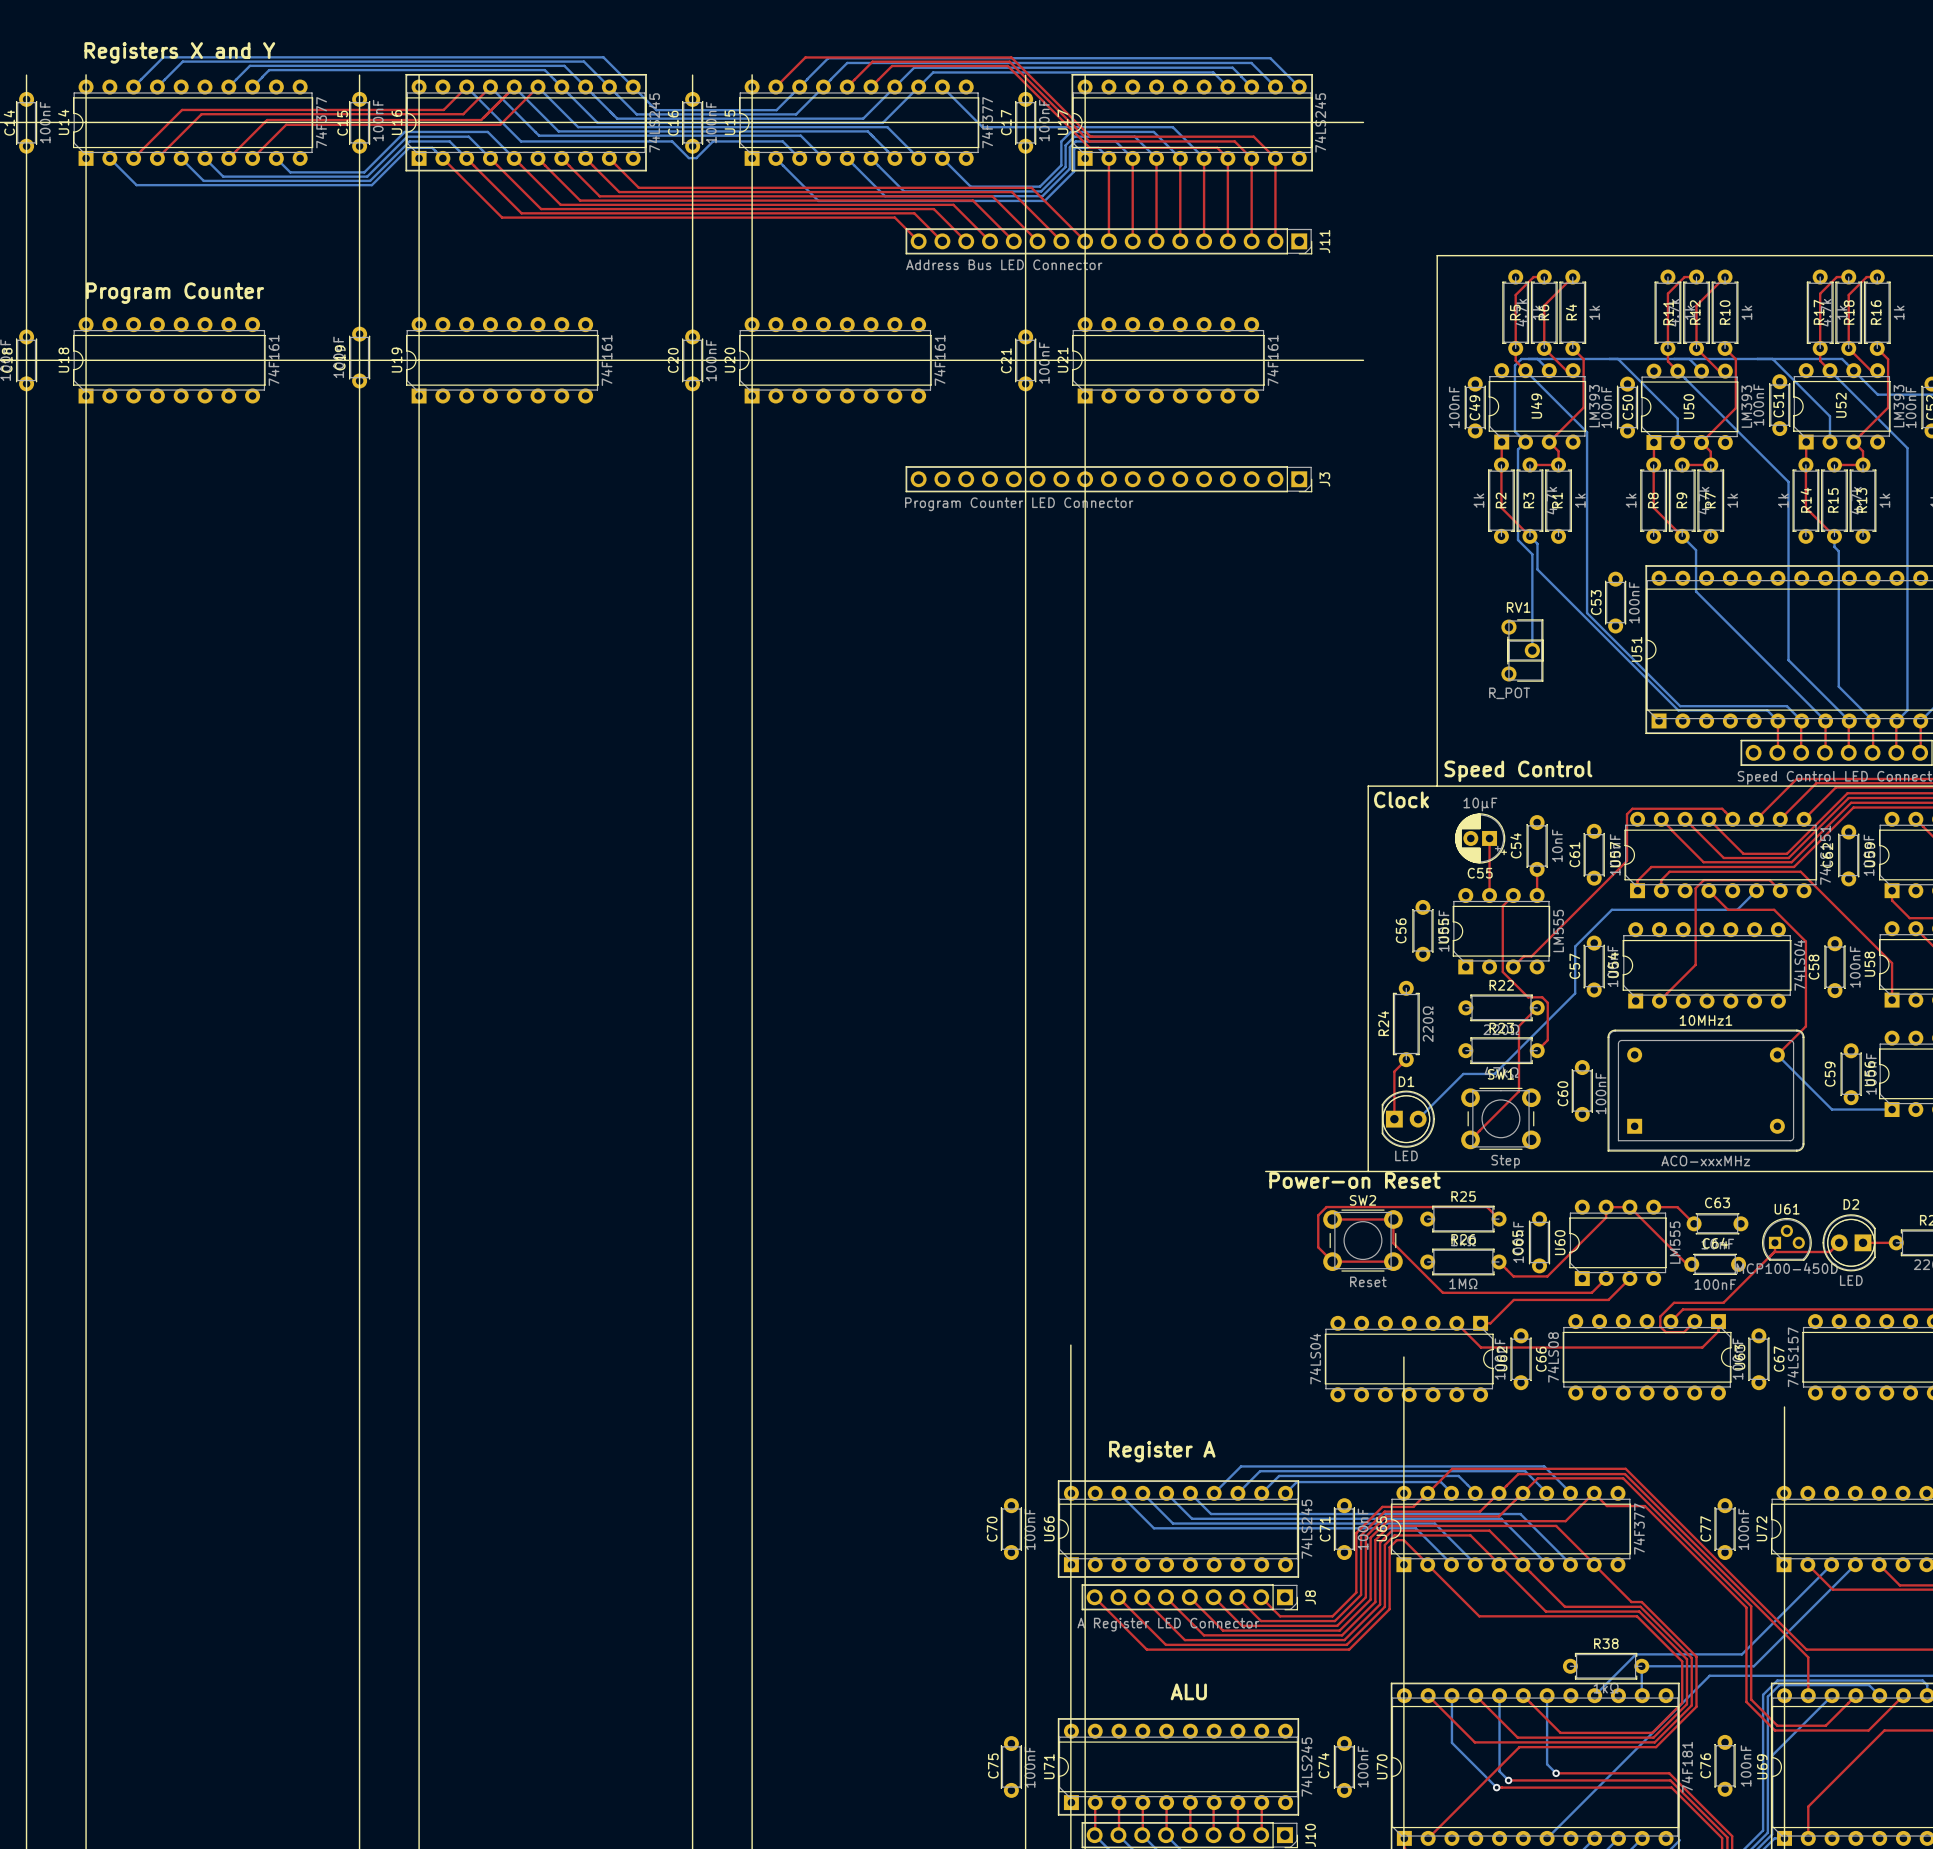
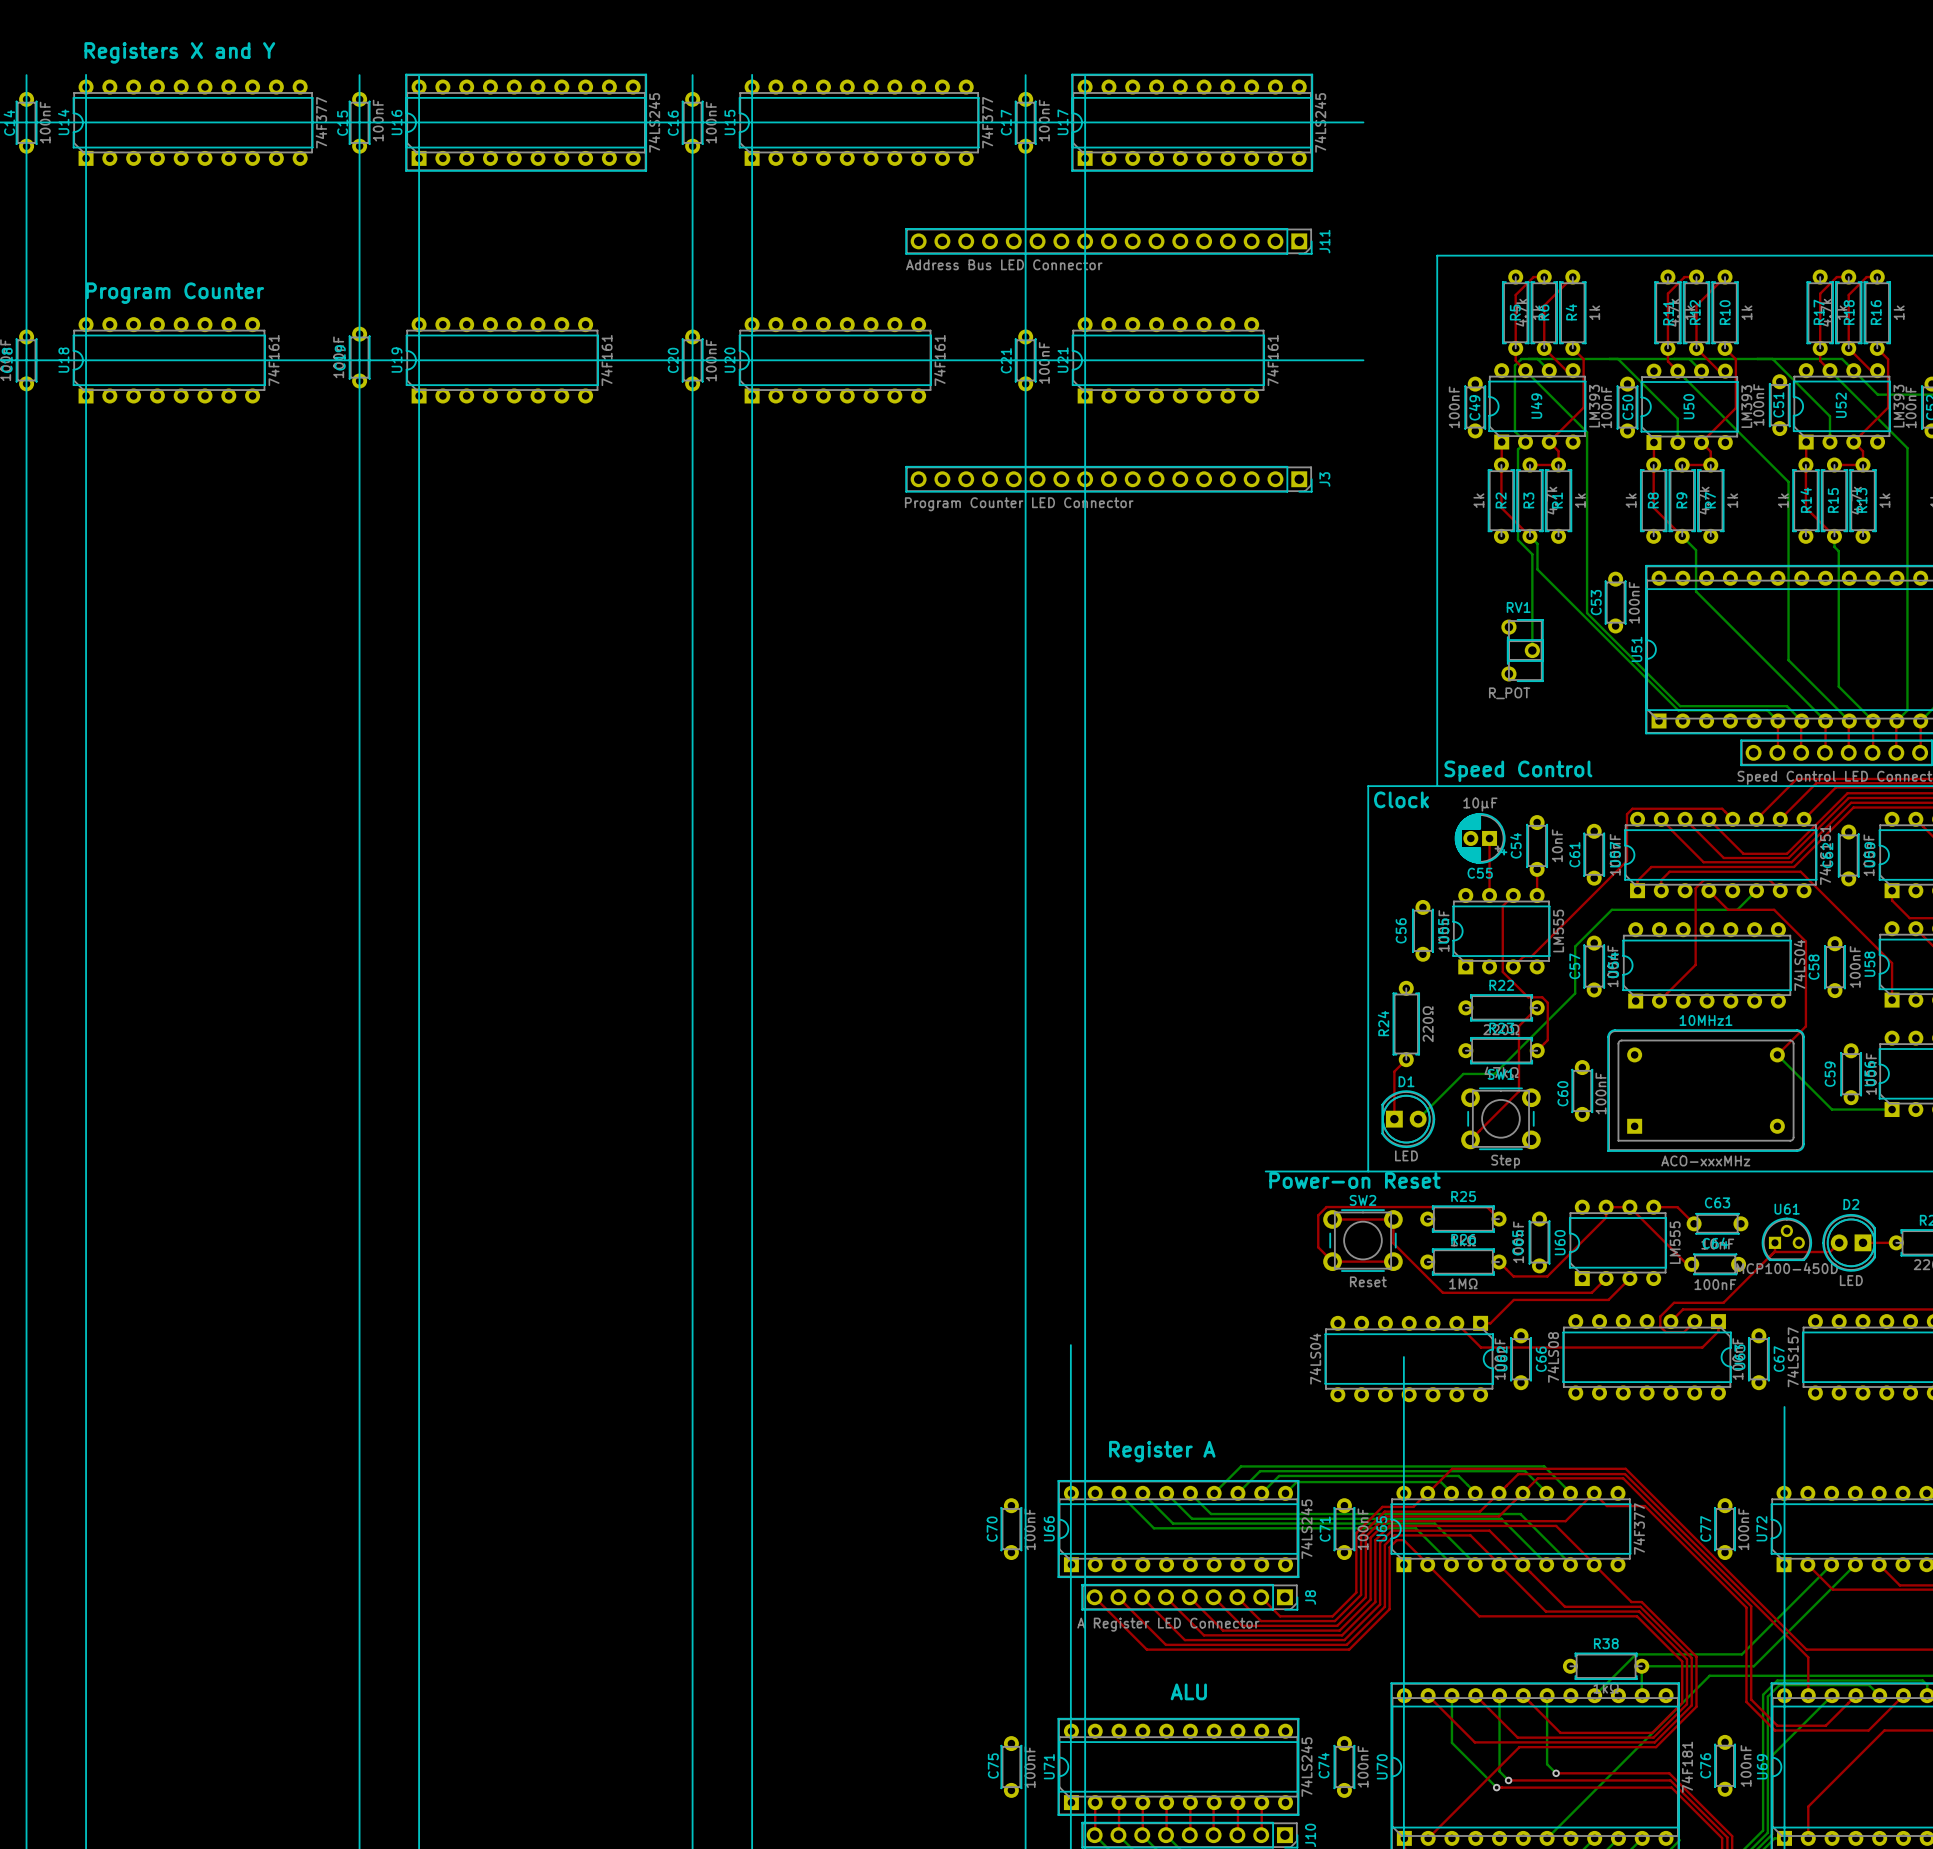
bottom track: (133, 87) (163, 57) (603, 57) (656, 110) (776, 110) (828, 58) (1270, 58) (1299, 87) -> none
bottom track: (157, 87) (182, 61) (583, 61) (636, 114) (796, 114) (847, 62) (1251, 62) (1275, 87) -> none
bottom track: (228, 87) (249, 65) (564, 65) (617, 118) (863, 118) (914, 67) (1232, 67) (1251, 87) -> none
bottom track: (252, 87) (269, 70) (544, 70) (597, 122) (882, 122) (933, 72) (1213, 72) (1227, 87) -> none
top track: (466, 87) (443, 109) (182, 109) (133, 158) -> none
bottom track: (466, 87) (521, 141) (672, 141) (688, 158) (696, 158) (713, 141) (782, 141) (799, 158) -> none
top track: (490, 87) (463, 114) (201, 114) (157, 158) -> none
bottom track: (490, 87) (539, 135) (800, 135) (823, 158) -> none
top track: (514, 87) (481, 120) (267, 120) (228, 158) -> none
bottom track: (514, 87) (558, 131) (867, 131) (894, 158) -> none
top track: (538, 87) (500, 124) (286, 124) (252, 158) -> none
bottom track: (538, 87) (578, 127) (887, 127) (918, 158) -> none
top track: (775, 87) (805, 57) (1011, 57) (1090, 136) (1253, 136) (1275, 158) (1275, 241) -> none
top track: (847, 87) (872, 61) (1009, 61) (1089, 141) (1234, 141) (1251, 158) (1251, 241) -> none
top track: (871, 87) (892, 65) (1007, 65) (1089, 147) (1217, 147) (1227, 158) (1227, 241) -> none
bottom track: (942, 87) (982, 127) (1172, 127) (1204, 158) -> none
bottom track: (109, 158) (136, 185) (371, 185) (409, 147) (432, 147) (442, 158) -> none
bottom track: (181, 158) (203, 180) (370, 180) (409, 141) (449, 141) (466, 158) -> none
bottom track: (204, 158) (223, 176) (367, 176) (407, 136) (468, 136) (490, 158) -> none
bottom track: (276, 158) (290, 172) (364, 172) (404, 131) (487, 131) (514, 158) -> none
top track: (442, 158) (502, 217) (894, 217) (918, 241) -> none
top track: (466, 158) (521, 213) (914, 213) (942, 241) -> none
top track: (490, 158) (541, 209) (933, 209) (966, 241) -> none
top track: (514, 158) (560, 204) (953, 204) (989, 241) -> none
top track: (538, 158) (580, 200) (972, 200) (1013, 241) -> none
top track: (561, 158) (599, 196) (992, 196) (1037, 241) -> none
top track: (585, 158) (619, 192) (1012, 192) (1061, 241) -> none
top track: (609, 158) (638, 187) (1031, 187) (1085, 241) -> none
bottom track: (775, 158) (818, 200) (1044, 200) (1074, 171) (1075, 147) (1098, 147) (1108, 158) -> none
bottom track: (847, 158) (885, 196) (1042, 196) (1069, 168) (1069, 147) (1075, 141) (1115, 141) (1132, 158) -> none
bottom track: (871, 158) (904, 191) (1041, 191) (1065, 167) (1065, 145) (1074, 136) (1134, 136) (1156, 158) -> none
bottom track: (942, 158) (970, 186) (1039, 186) (1061, 165) (1061, 141) (1070, 131) (1153, 131) (1180, 158) -> none
top track: (1108, 158) (1108, 241) -> none
top track: (1132, 158) (1132, 241) -> none
top track: (1156, 158) (1156, 241) -> none
top track: (1180, 158) (1180, 241) -> none
top track: (1204, 158) (1204, 241) -> none

